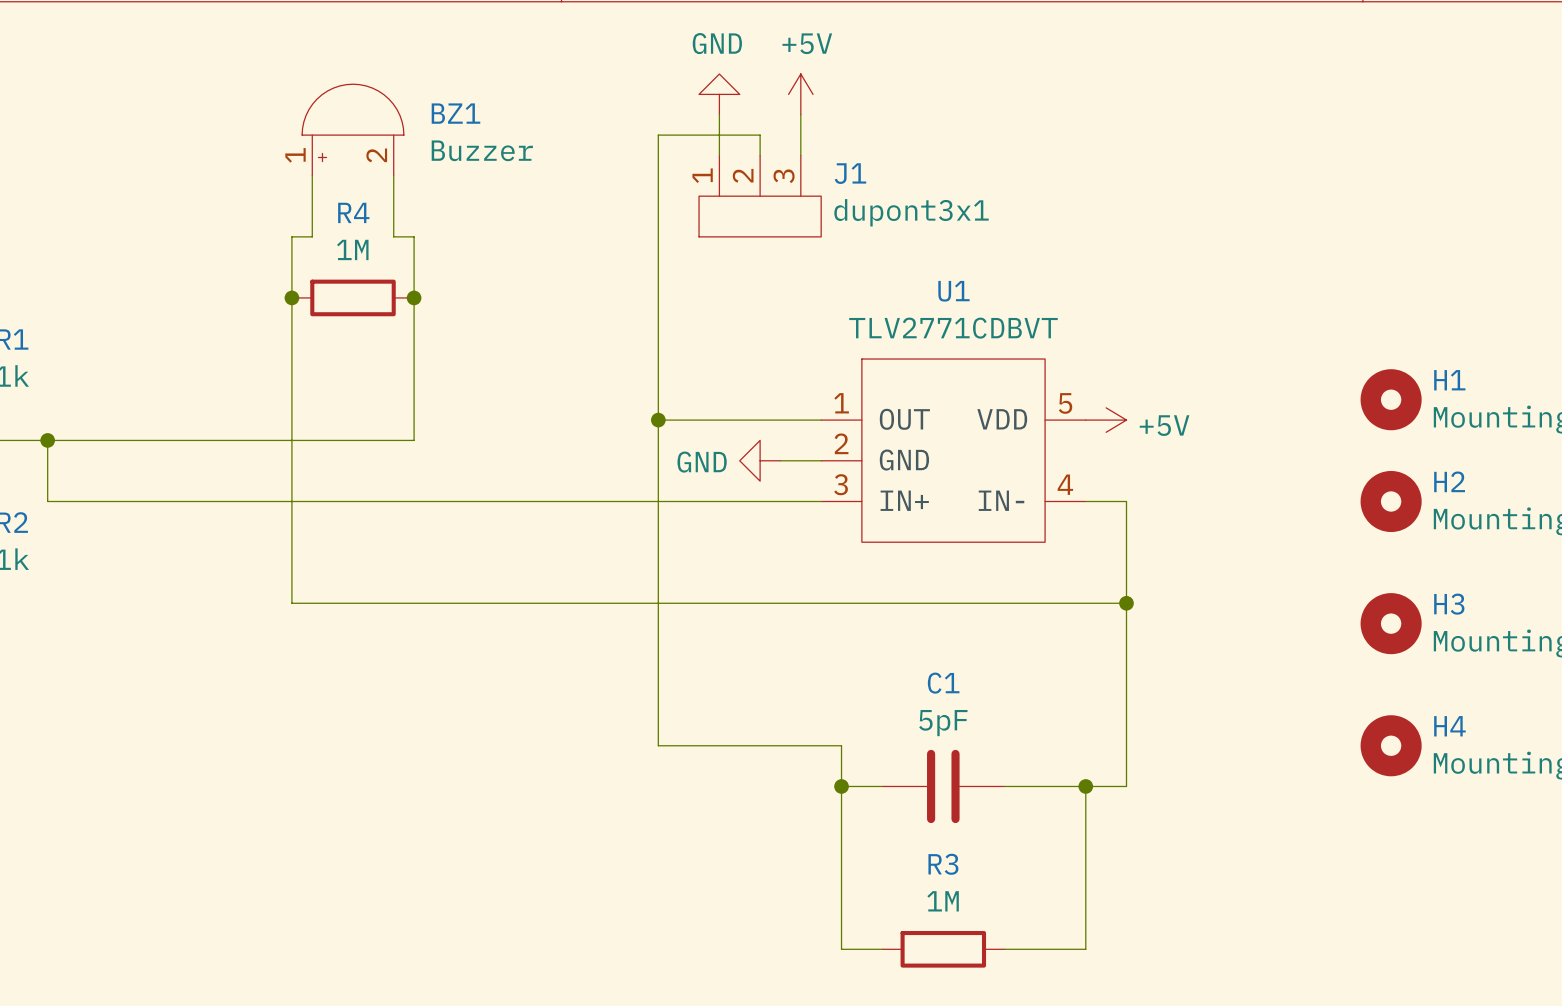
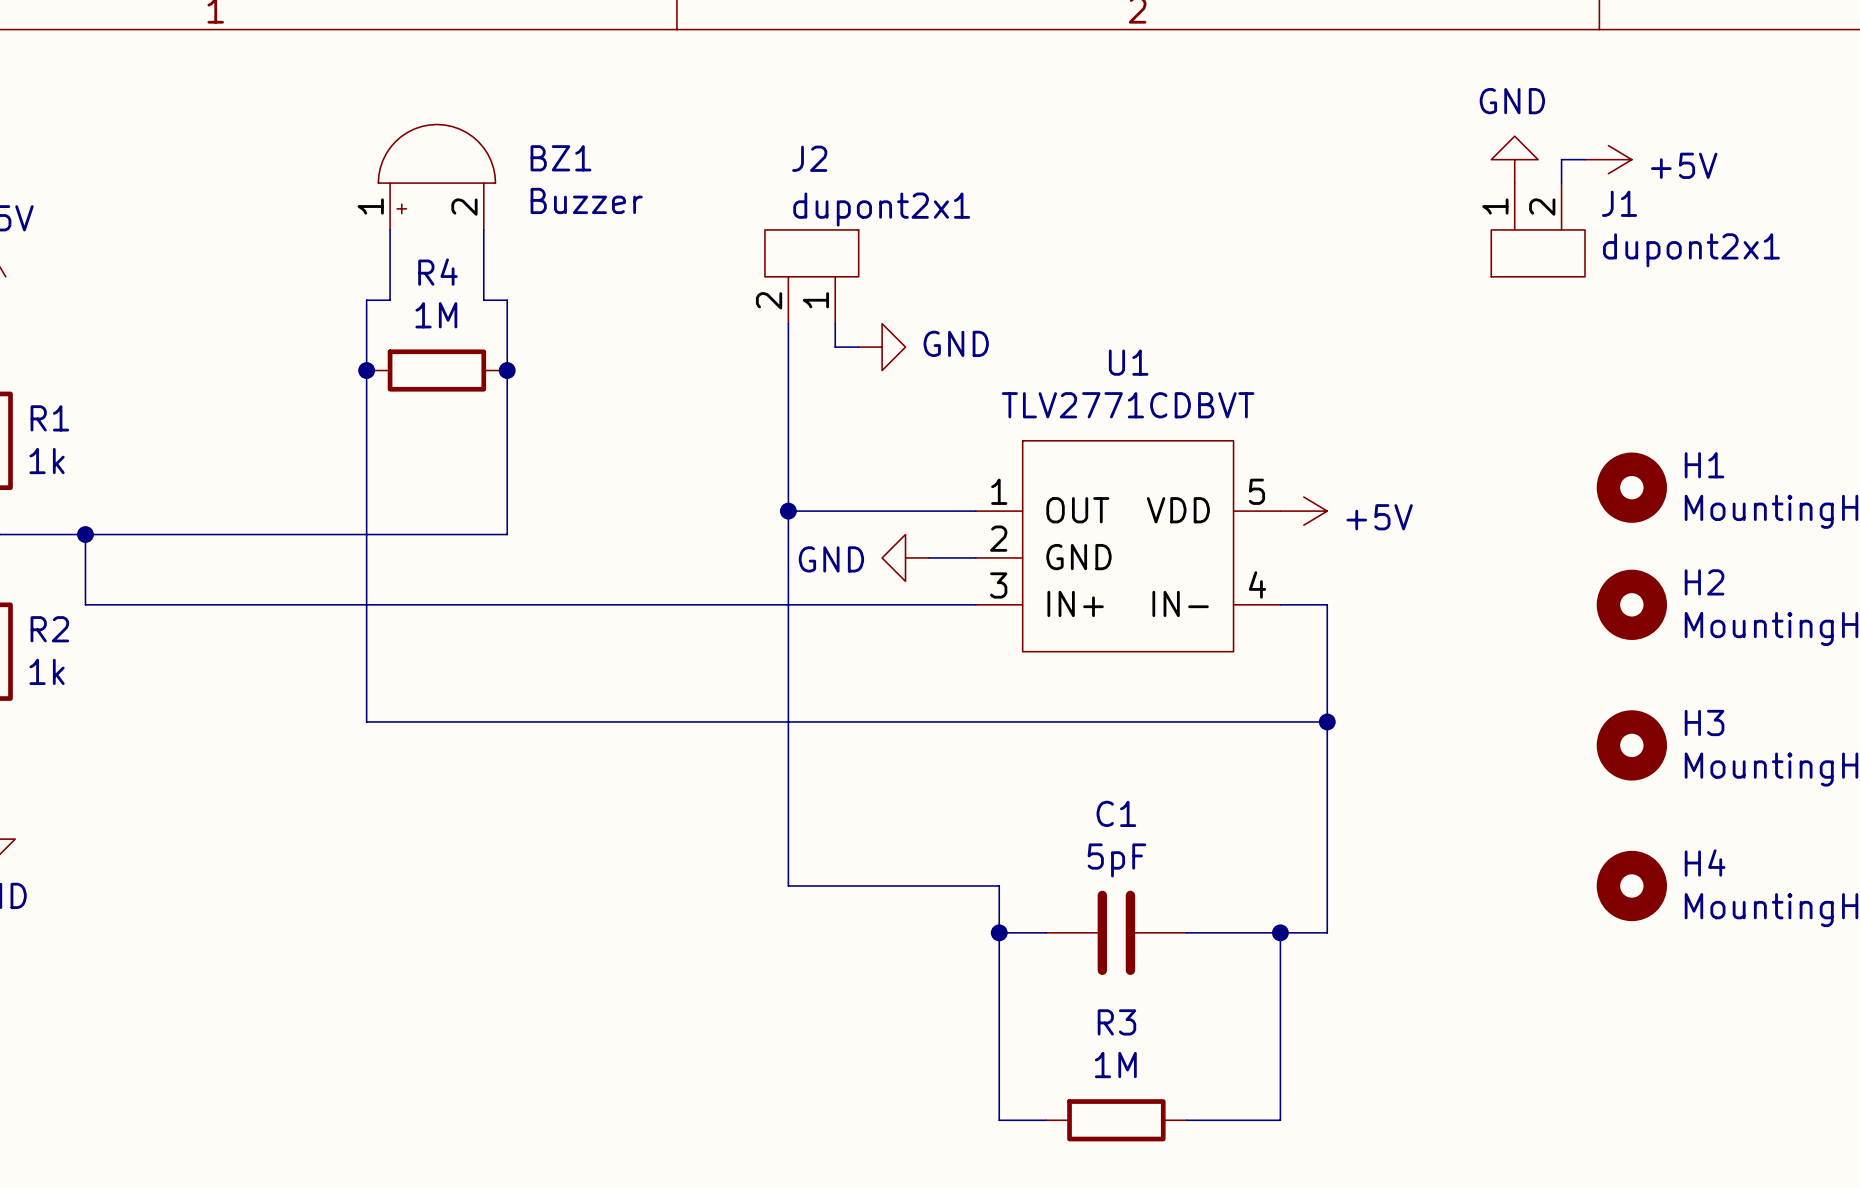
power symbol rotation: 0° (719, 94) -> 90° clockwise (882, 347)
power symbol position: GND (719, 94) -> GND (882, 347)
power symbol: +5V (800, 94) -> none
wire: (719, 114) (719, 155) -> none
wire: (800, 114) (800, 155) -> none
power symbol: none -> GND (1514, 159)
wire: none -> (1585, 159) (1561, 159) (1561, 183)
power symbol: none -> +5V (1608, 159)
J1 symbol: [699, 155, 822, 237] -> [1491, 183, 1586, 277]
wire: (760, 155) (760, 135) (658, 135) (658, 257) -> none
J1 value: dupont3x1 (911, 212) -> dupont2x1 (1691, 250)
J2: none -> dupont2x1 (811, 276)
wire: none -> (835, 323) (835, 347) (858, 347)

